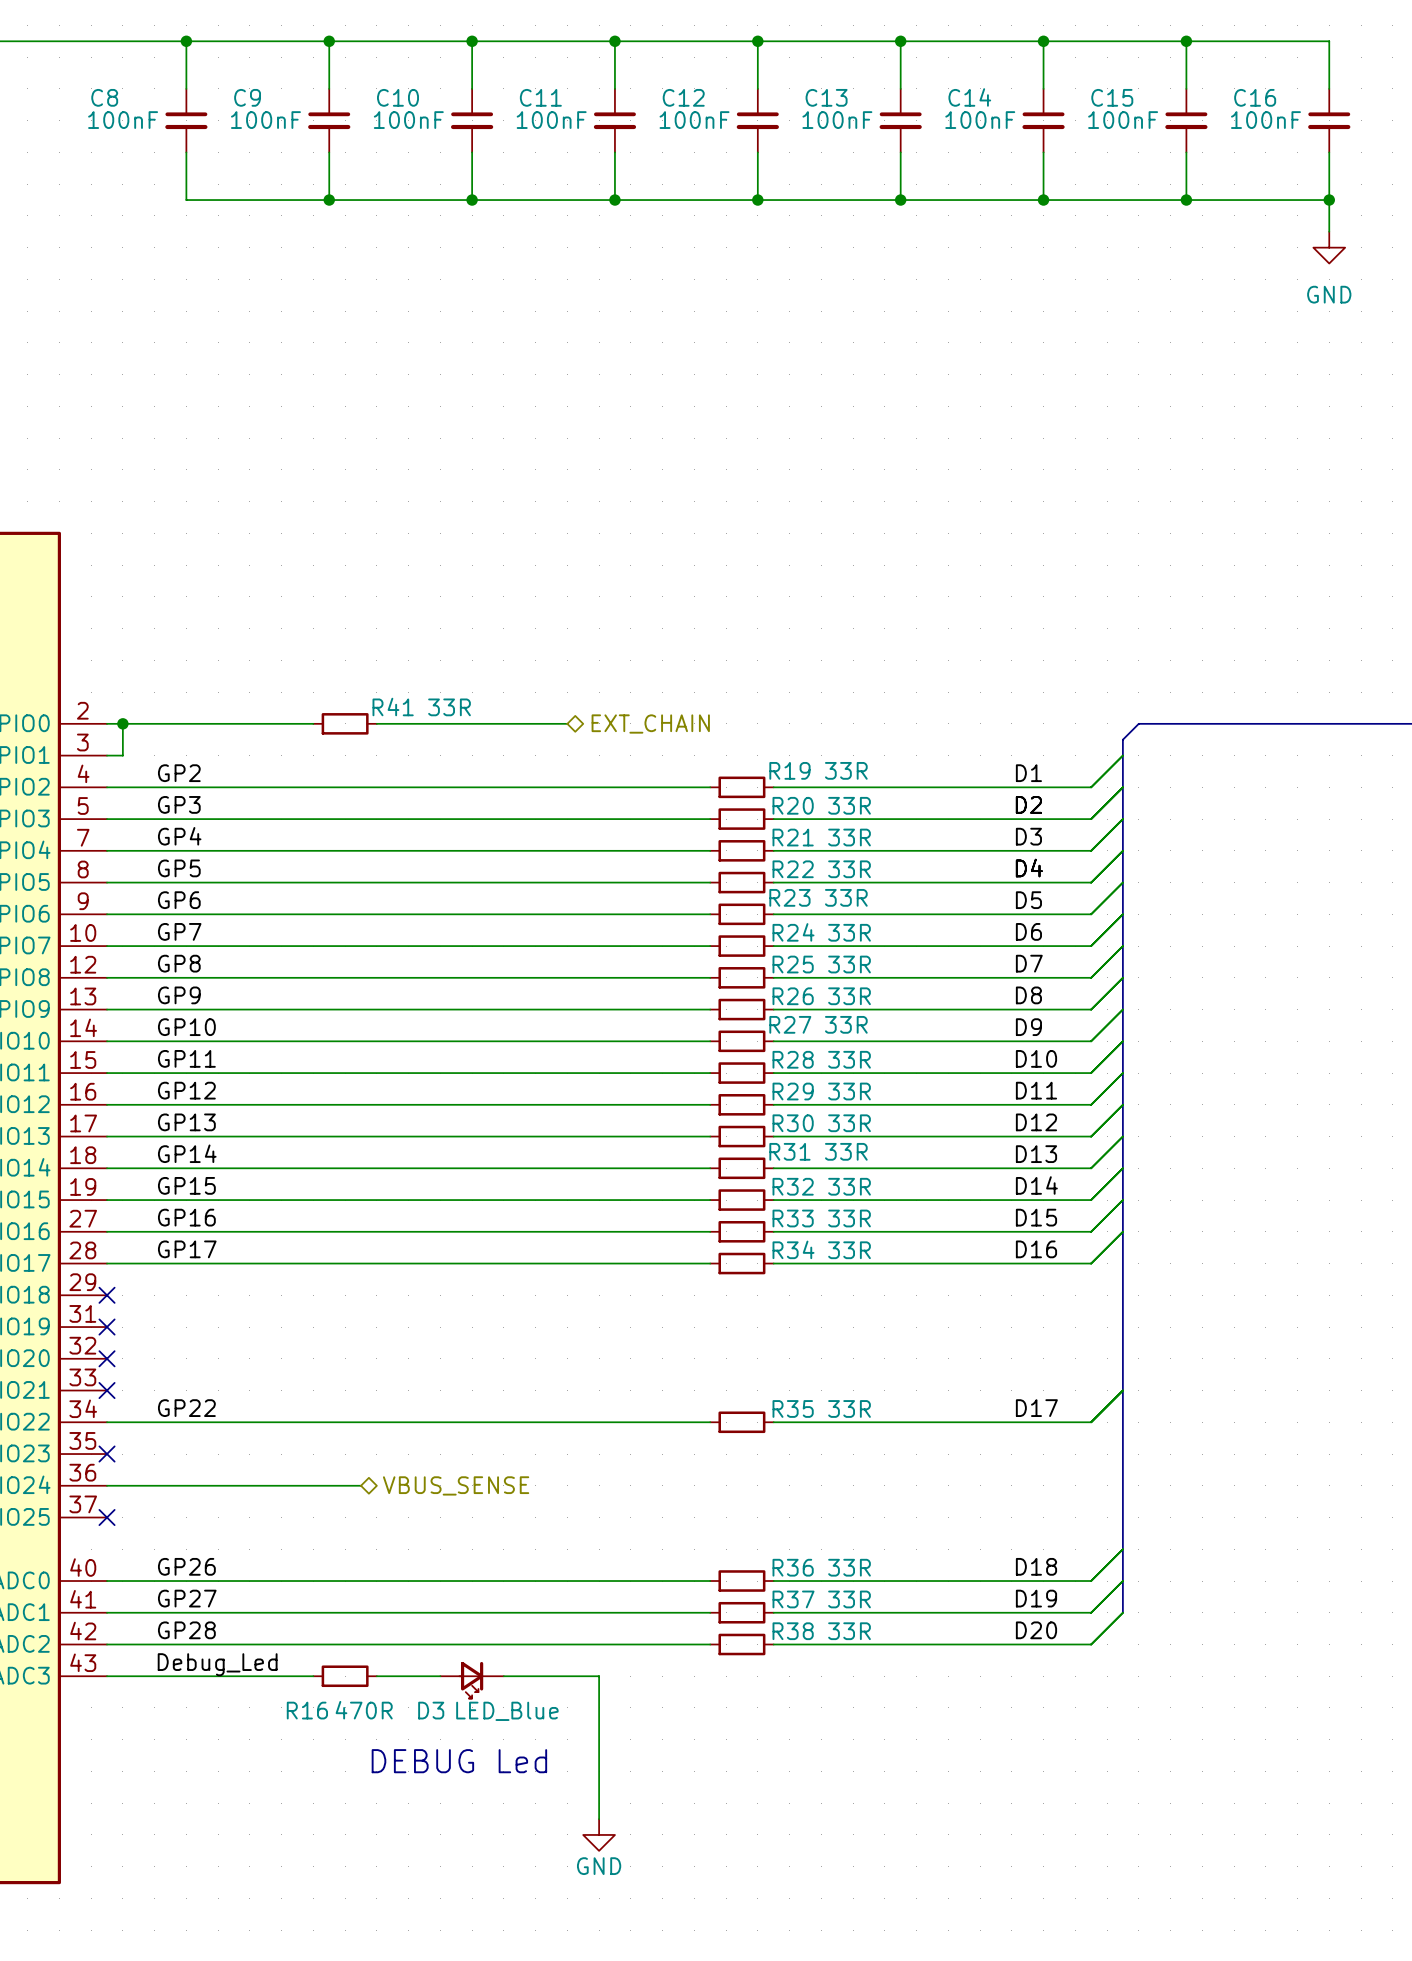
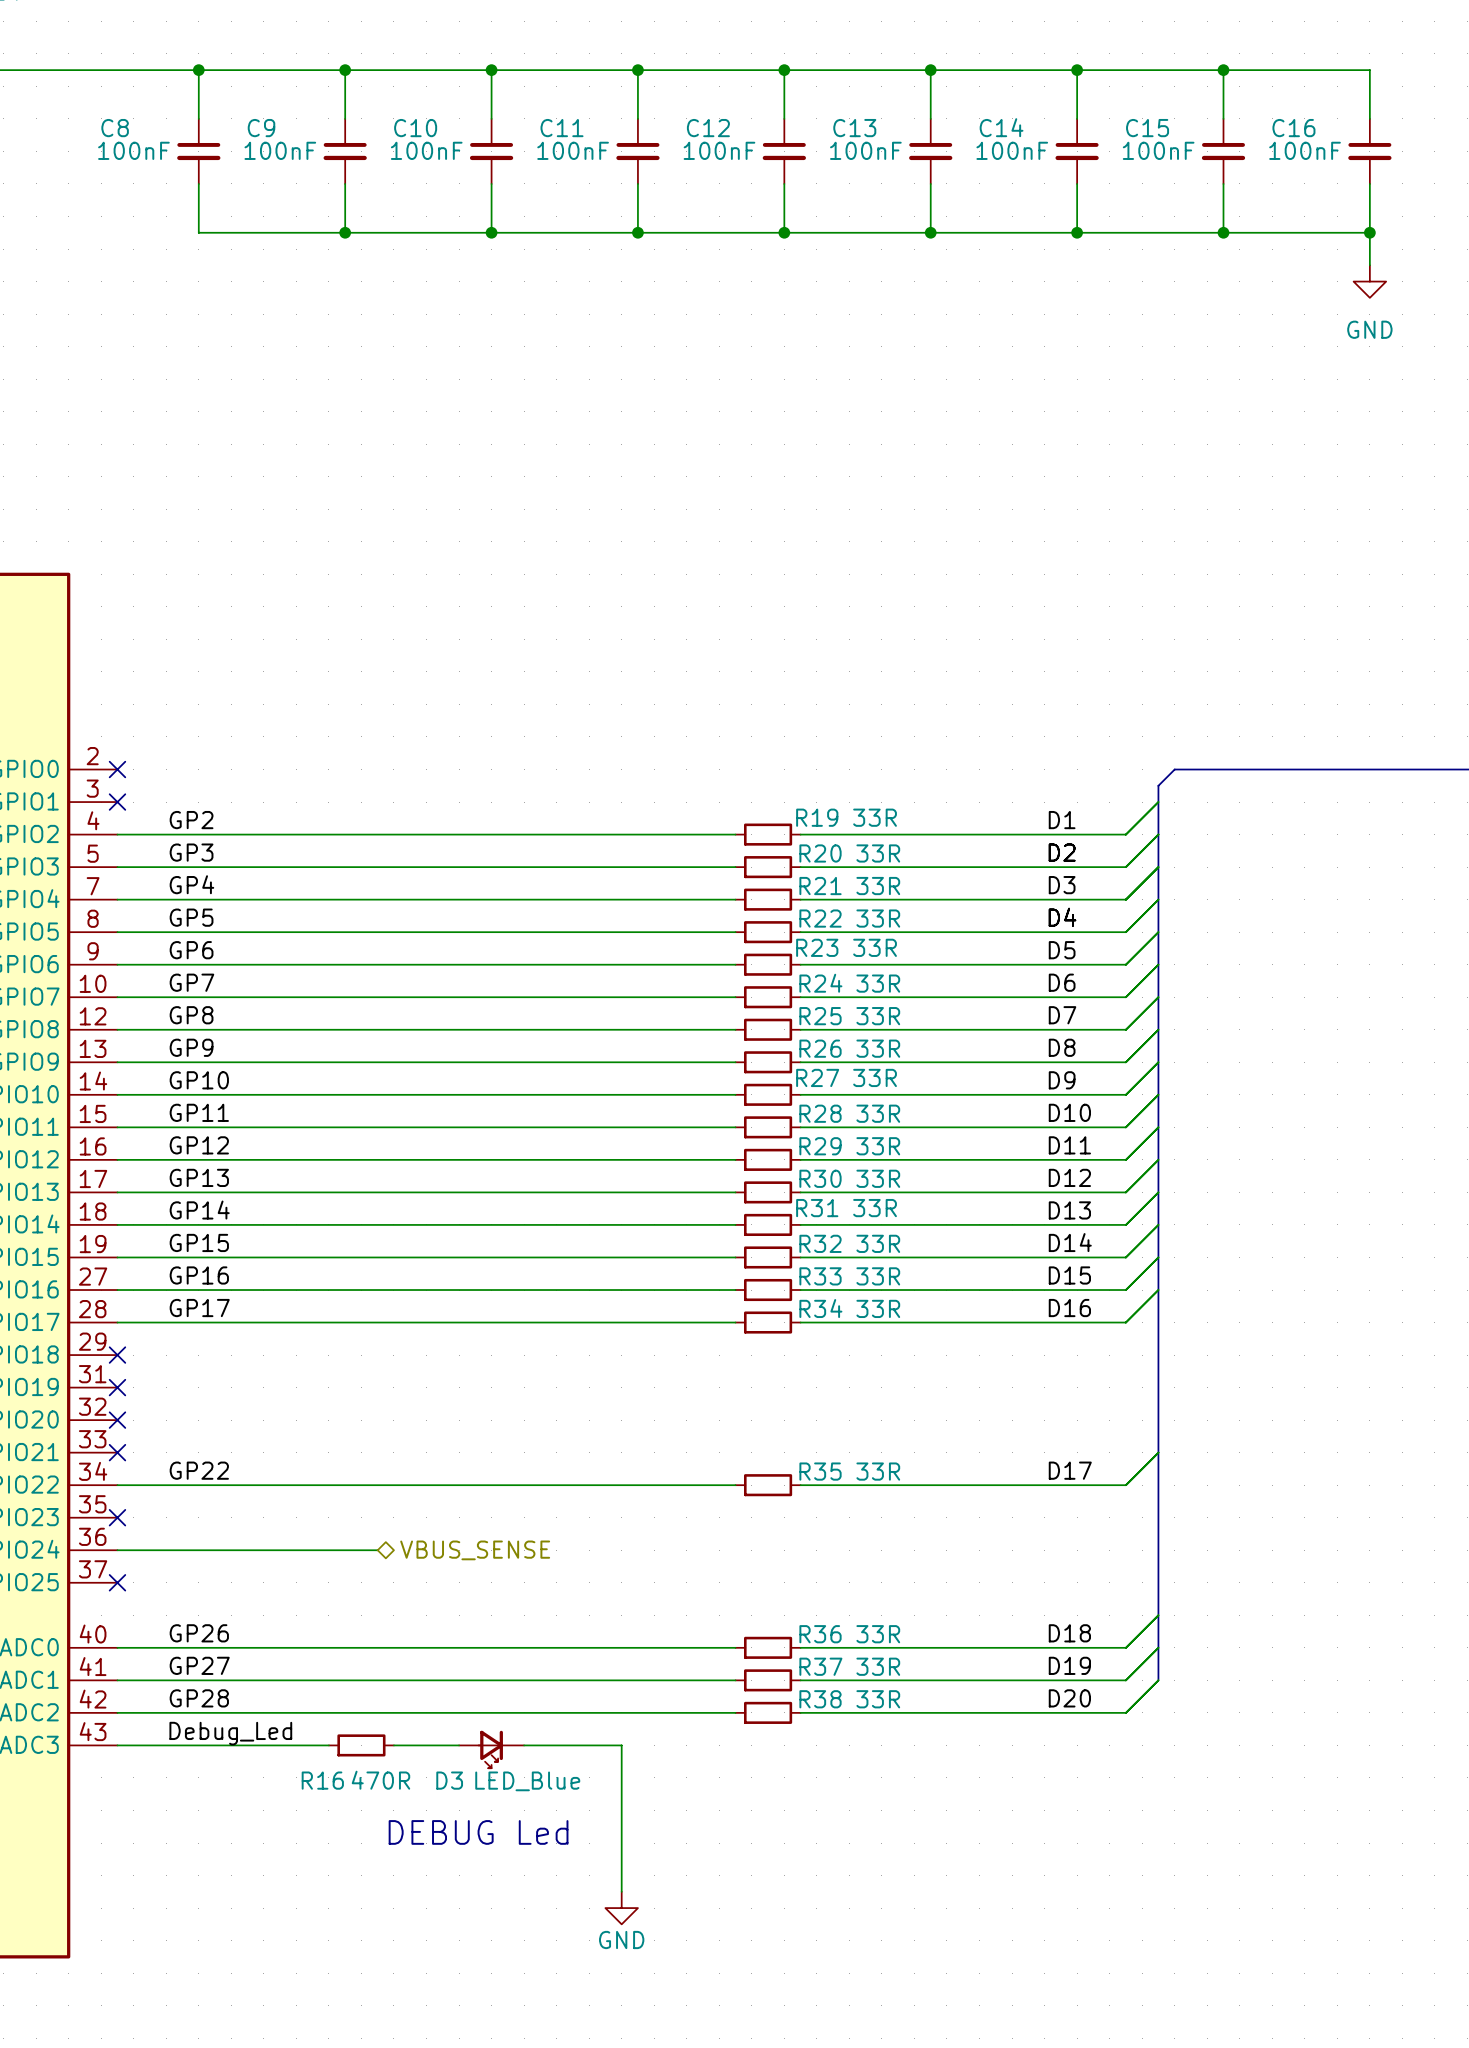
wire: (107, 723) (313, 723) -> none
no-connect mark: none -> (117, 769)
wire: (122, 723) (122, 755) (107, 755) -> none
junction: (122, 723) -> none
R41: 33R (345, 723) -> none
wire: (376, 723) (567, 723) -> none
hierarchical label: EXT_CHAIN (650, 724) -> none
no-connect mark: none -> (117, 802)

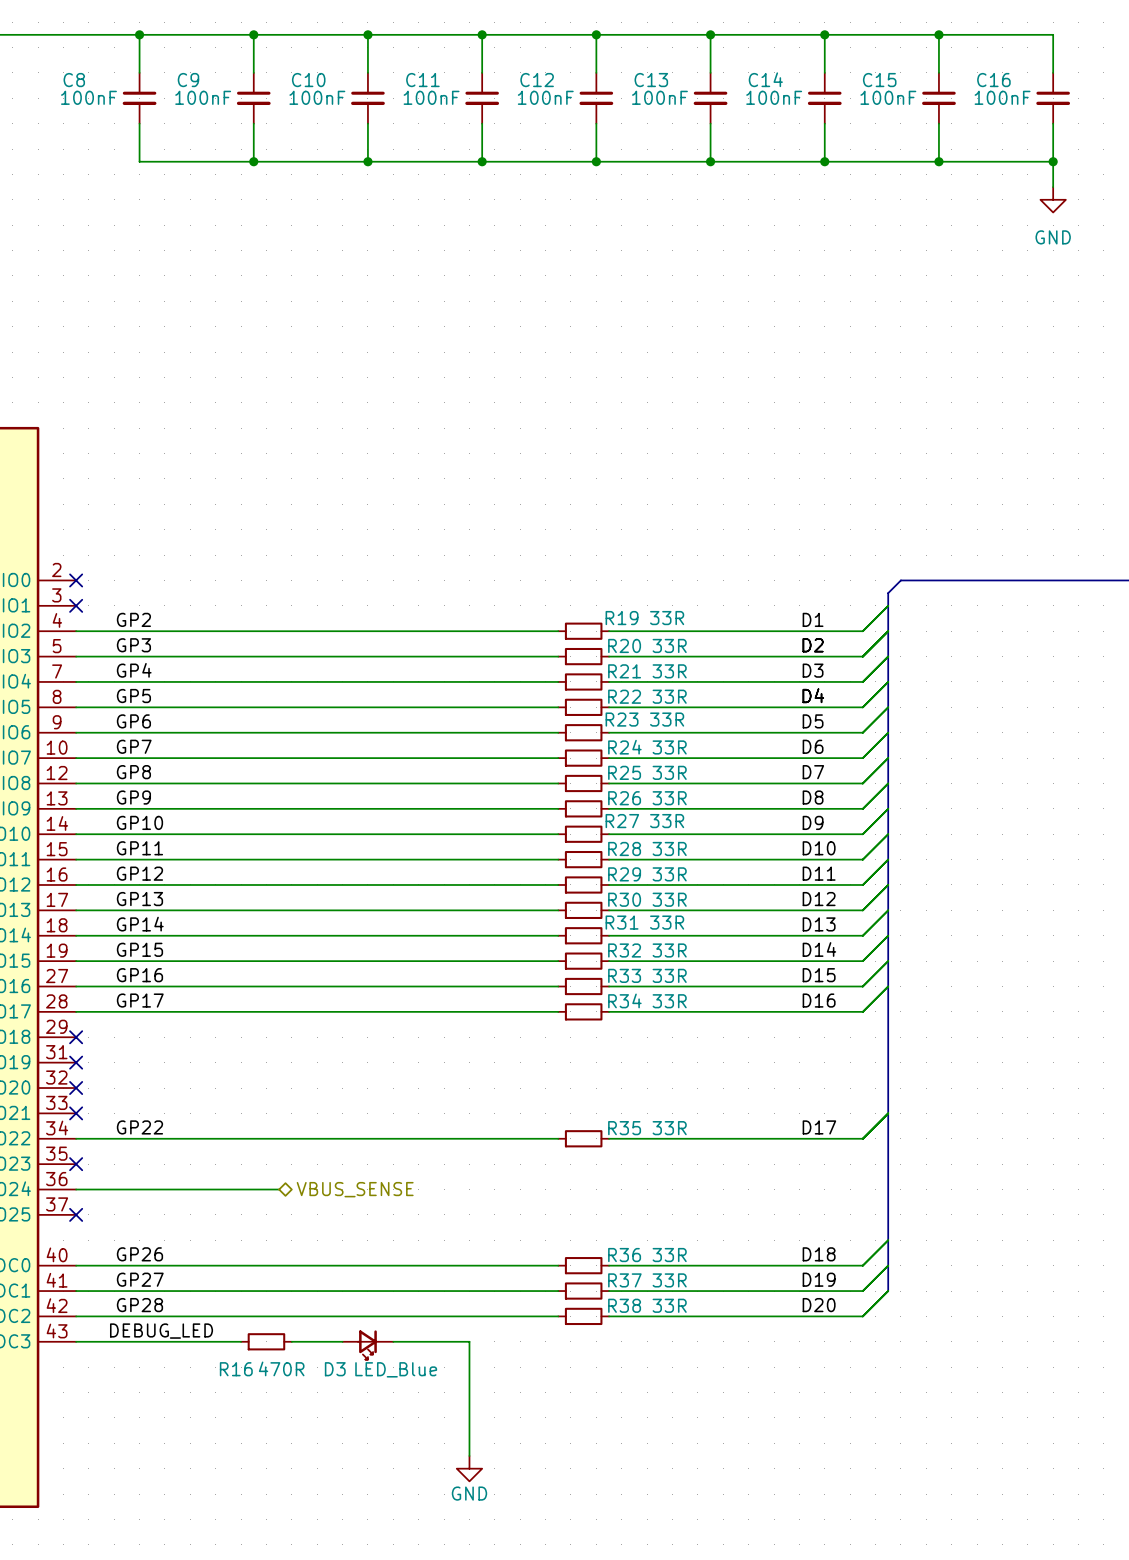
label: Debug_Led (230, 1733) -> DEBUG_LED (161, 1331)
text: DEBUG Led (478, 1832) -> none

